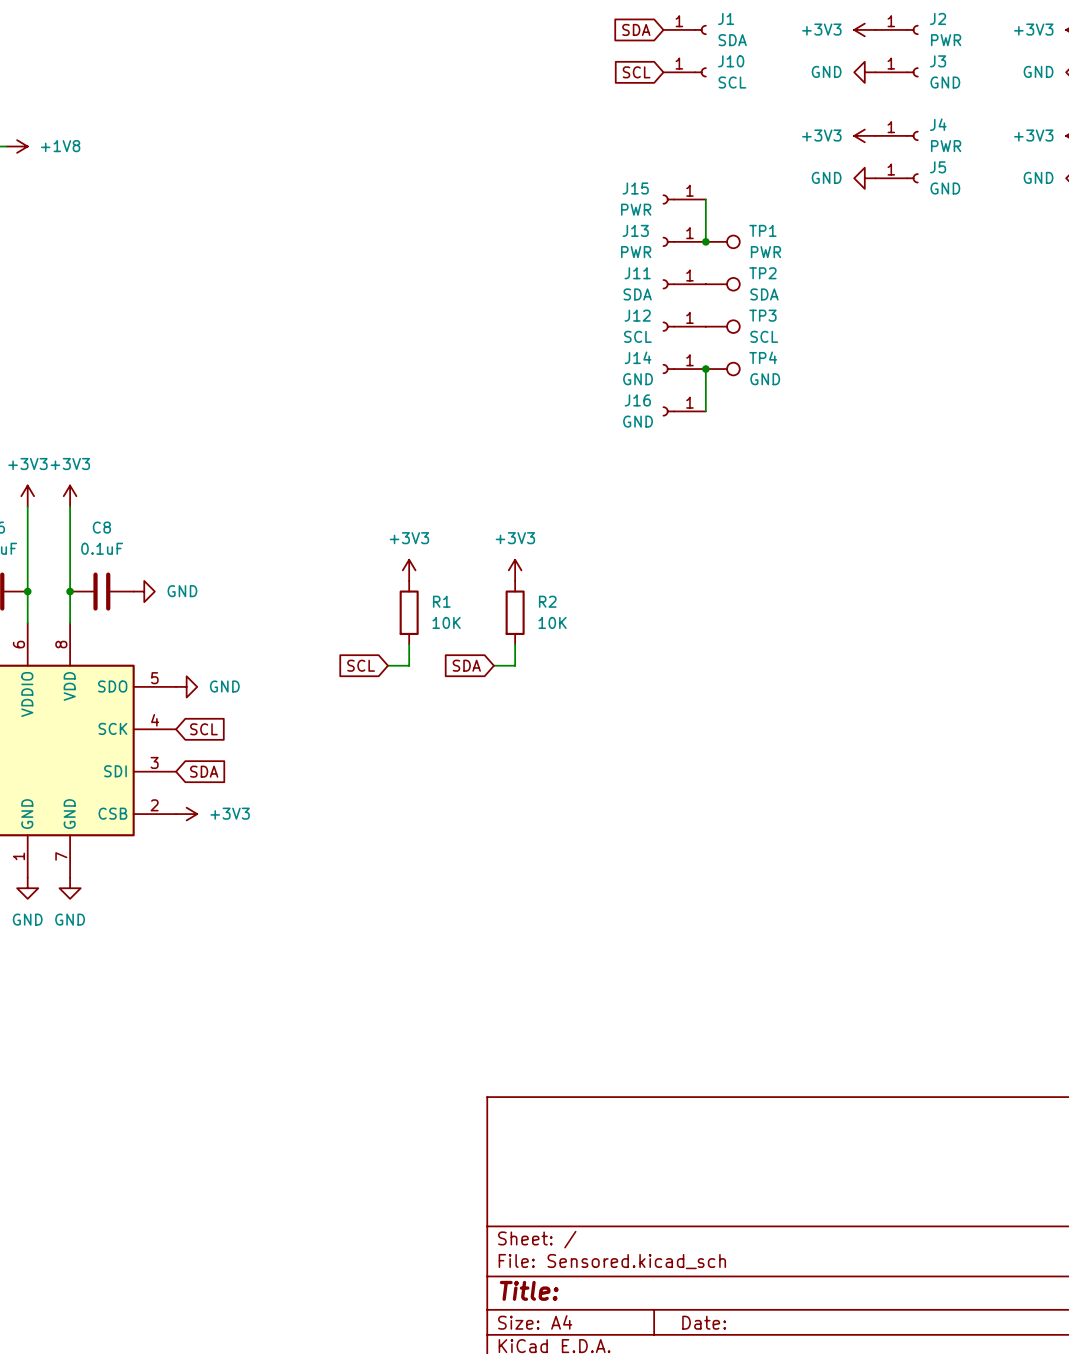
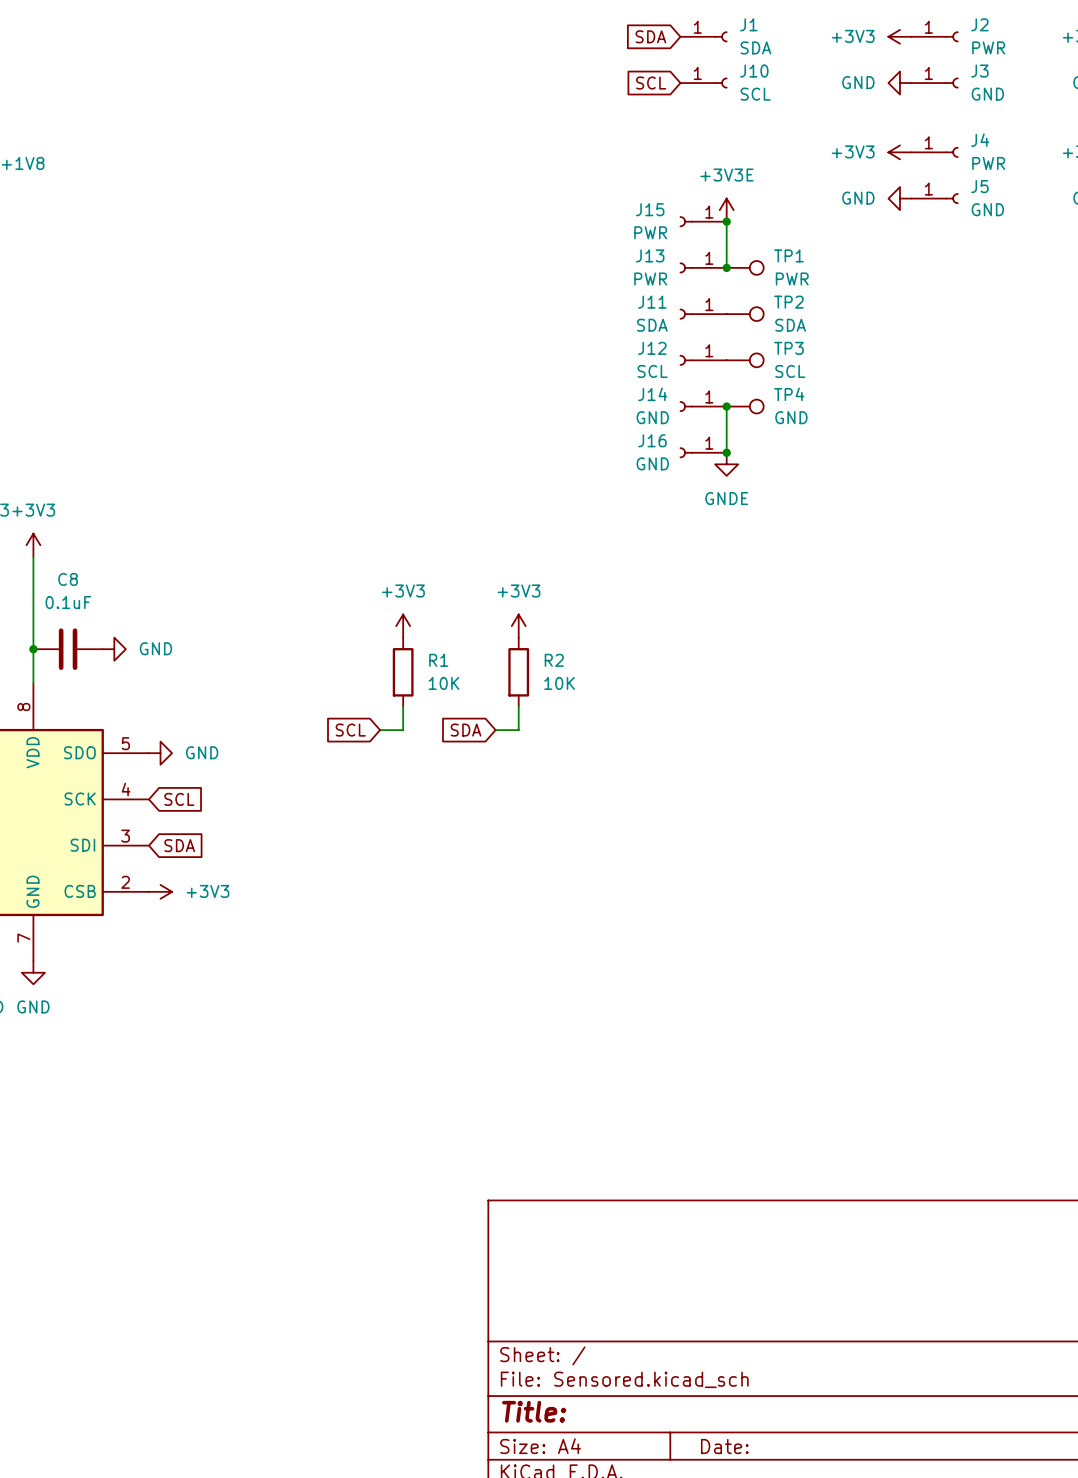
power symbol: none -> +3V3E (726, 210)
junction: none -> (726, 221)
junction: none -> (726, 452)
power symbol: none -> GNDE (726, 464)

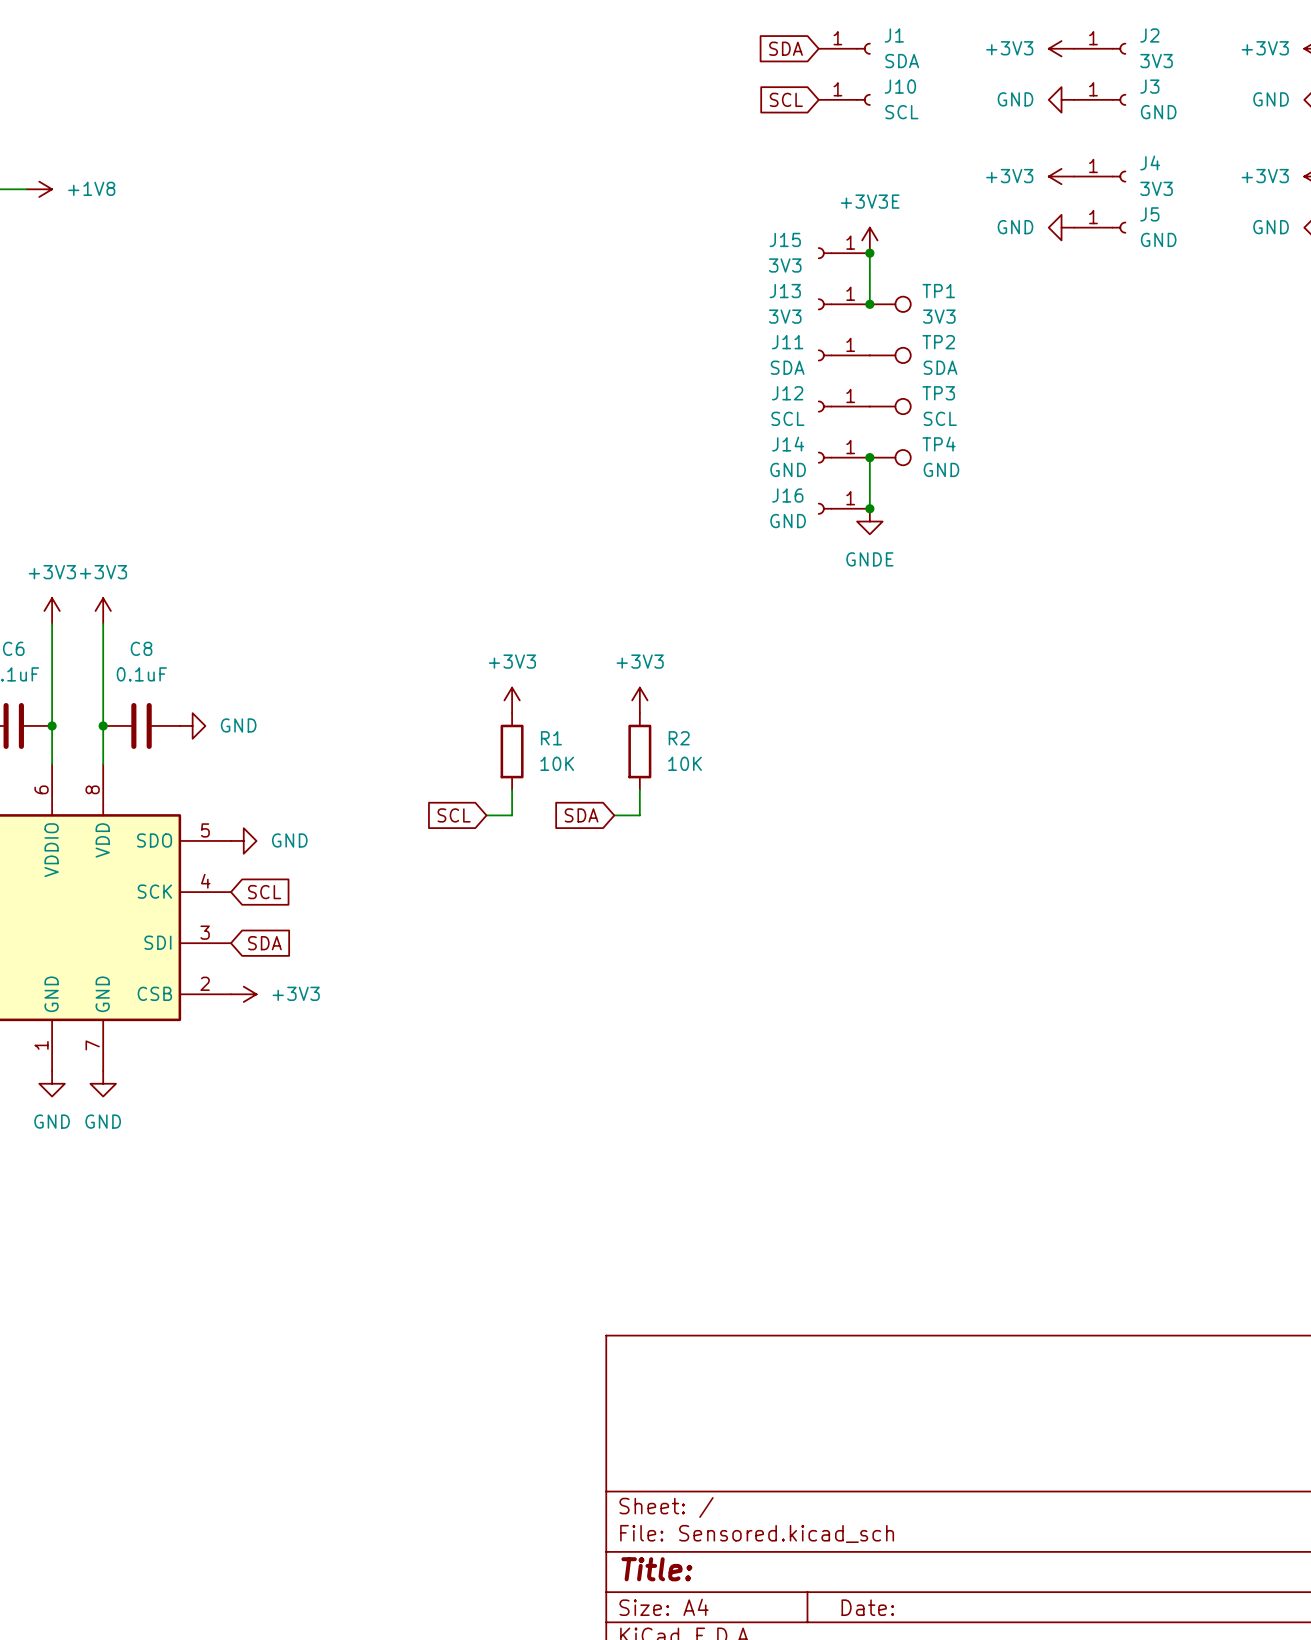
J2 value: PWR (988, 47) -> 3V3 (1156, 61)
J4 value: PWR (988, 163) -> 3V3 (1156, 188)
J15 value: PWR (650, 232) -> 3V3 (785, 265)
J13 value: PWR (650, 279) -> 3V3 (785, 316)
TP1 value: PWR (792, 279) -> 3V3 (939, 316)

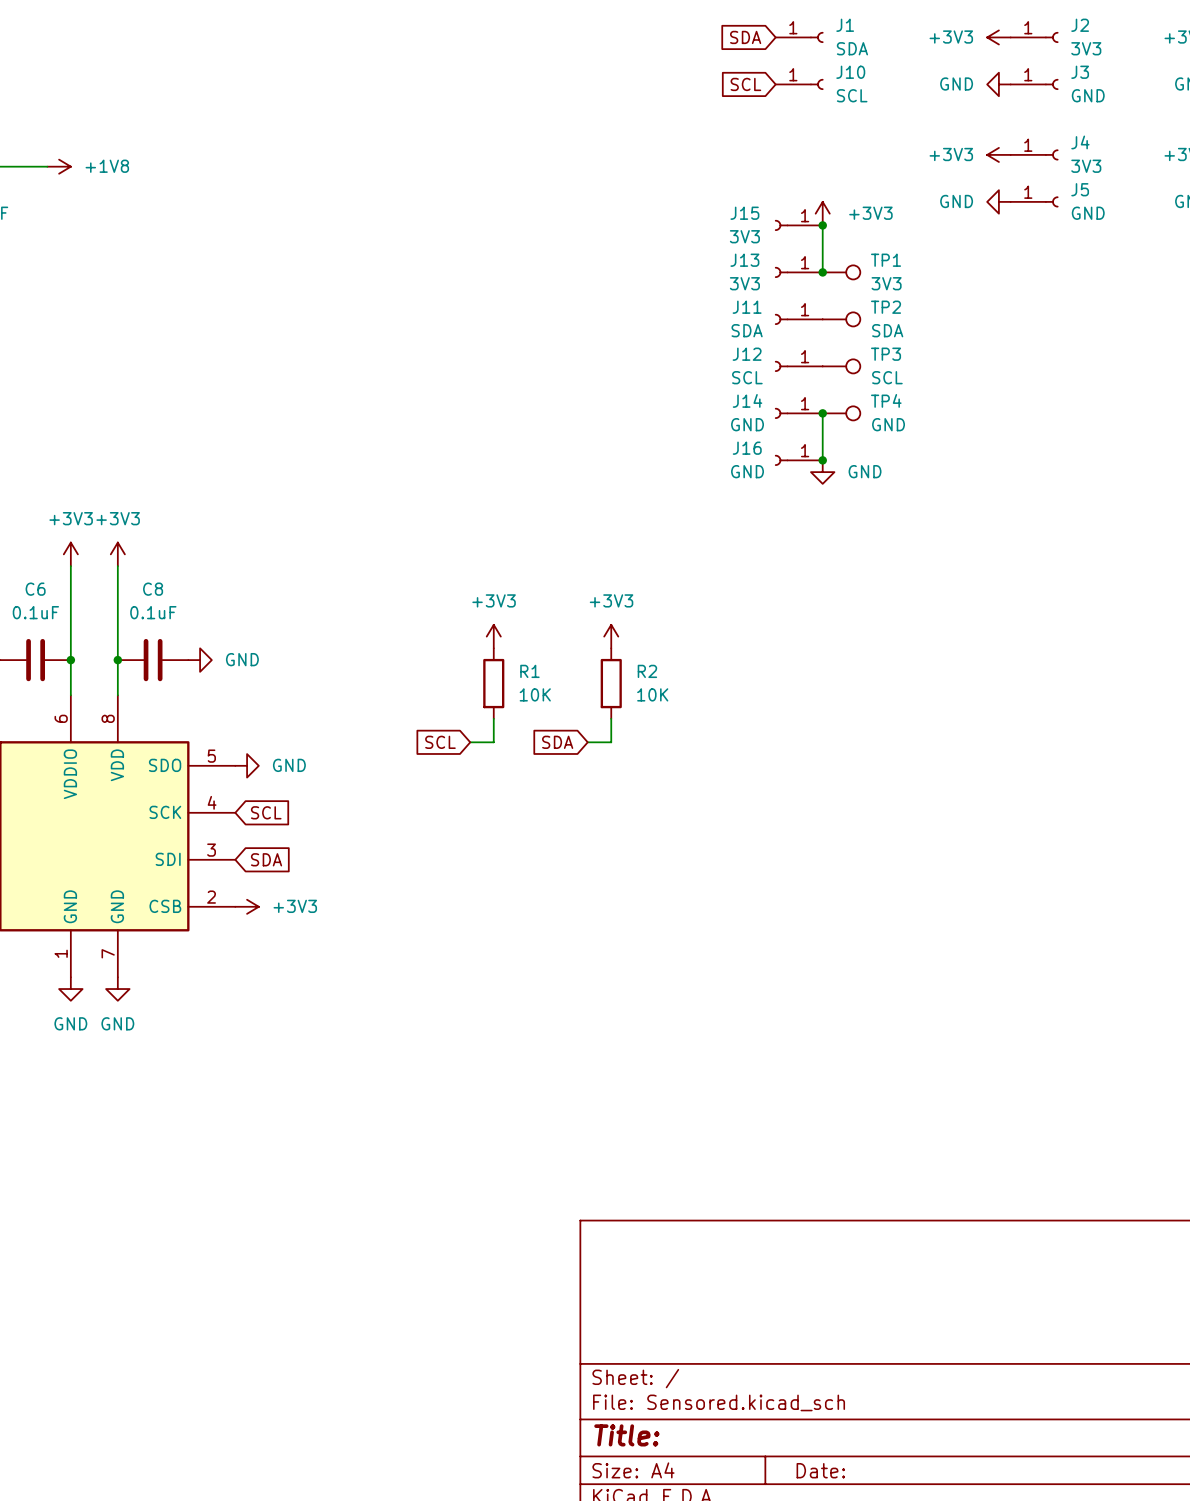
power symbol: +3V3E (869, 240) -> +3V3 (822, 213)
power symbol: GNDE (869, 521) -> GND (822, 472)

